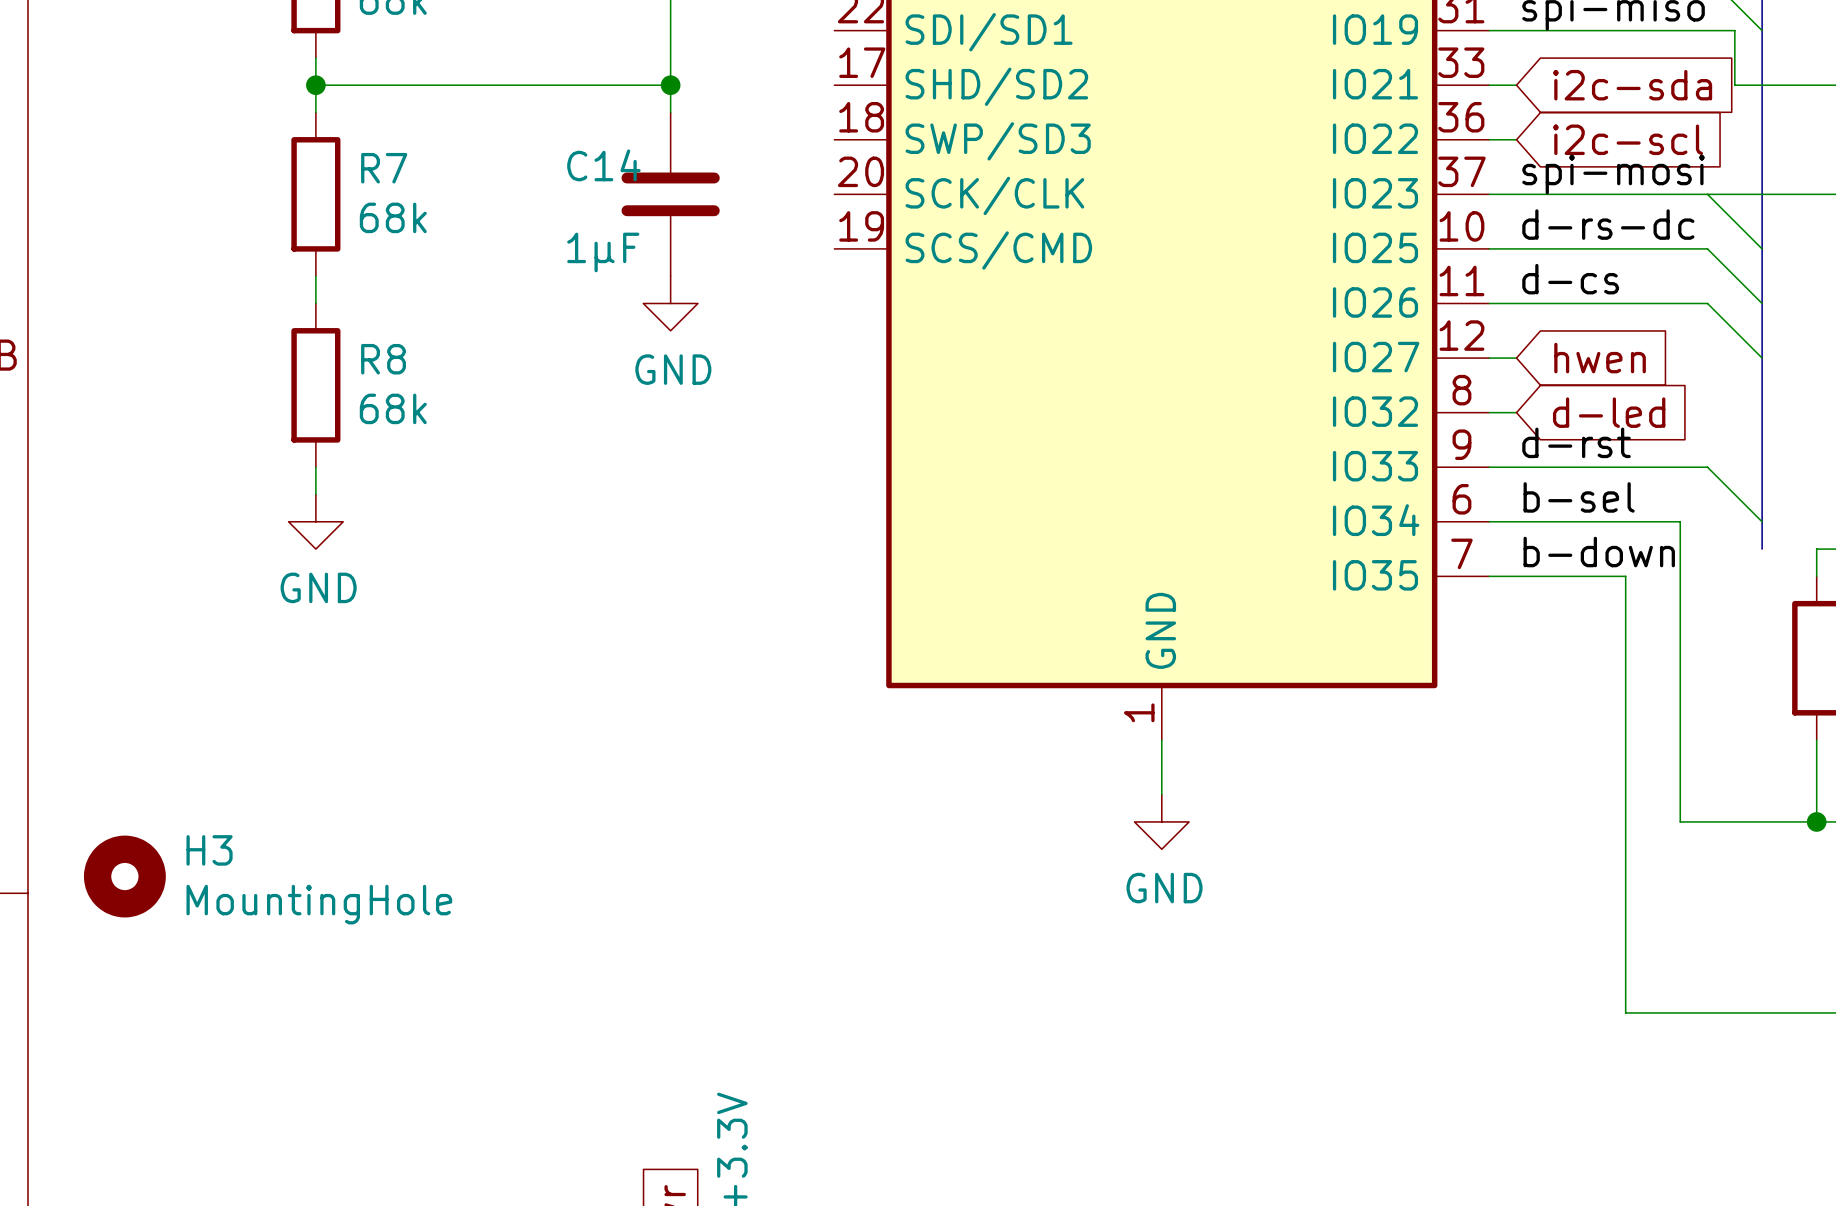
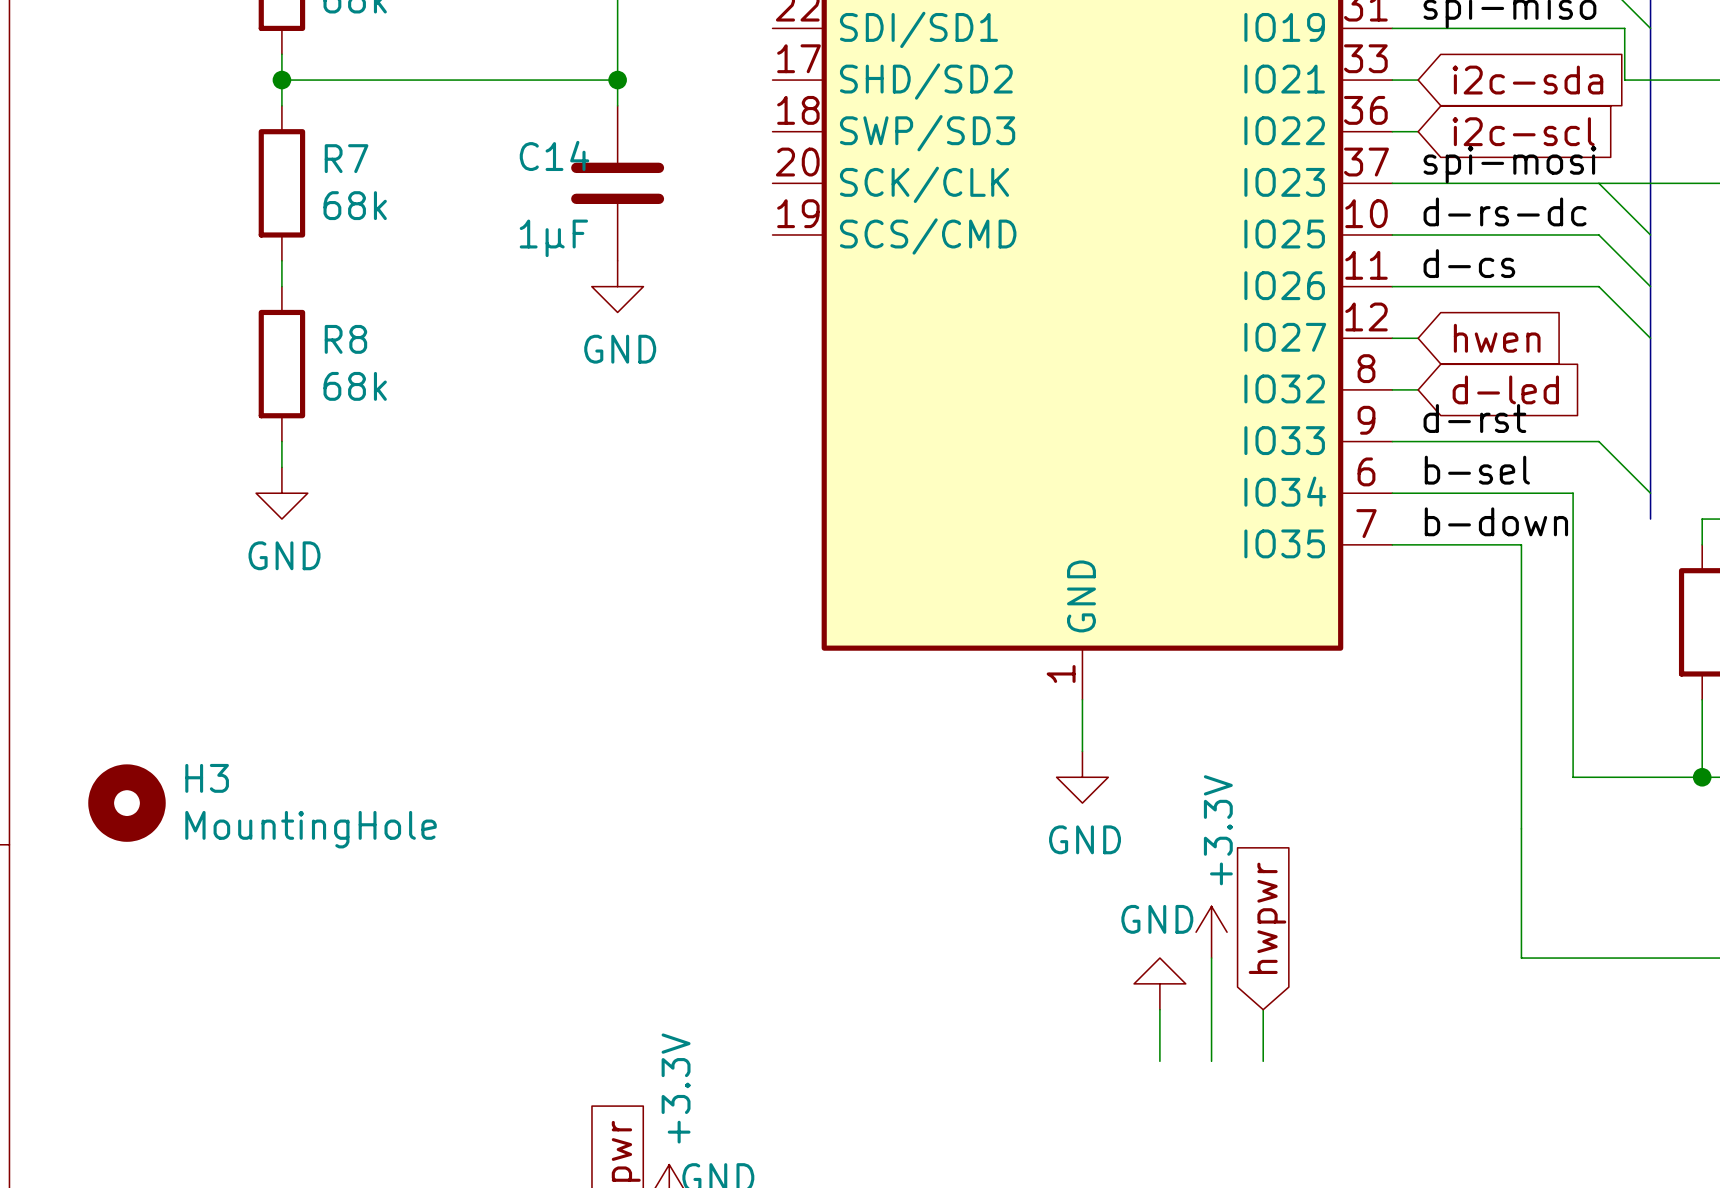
H3 position: (124, 876) -> (126, 803)
global label: none -> hwpwr (1267, 918)
power symbol: none -> +3.3V (1211, 932)
wire: none -> (1211, 958) (1211, 1061)
power symbol: none -> GND (1159, 983)
wire: none -> (1159, 1009) (1159, 1061)
wire: none -> (1263, 1009) (1263, 1061)

